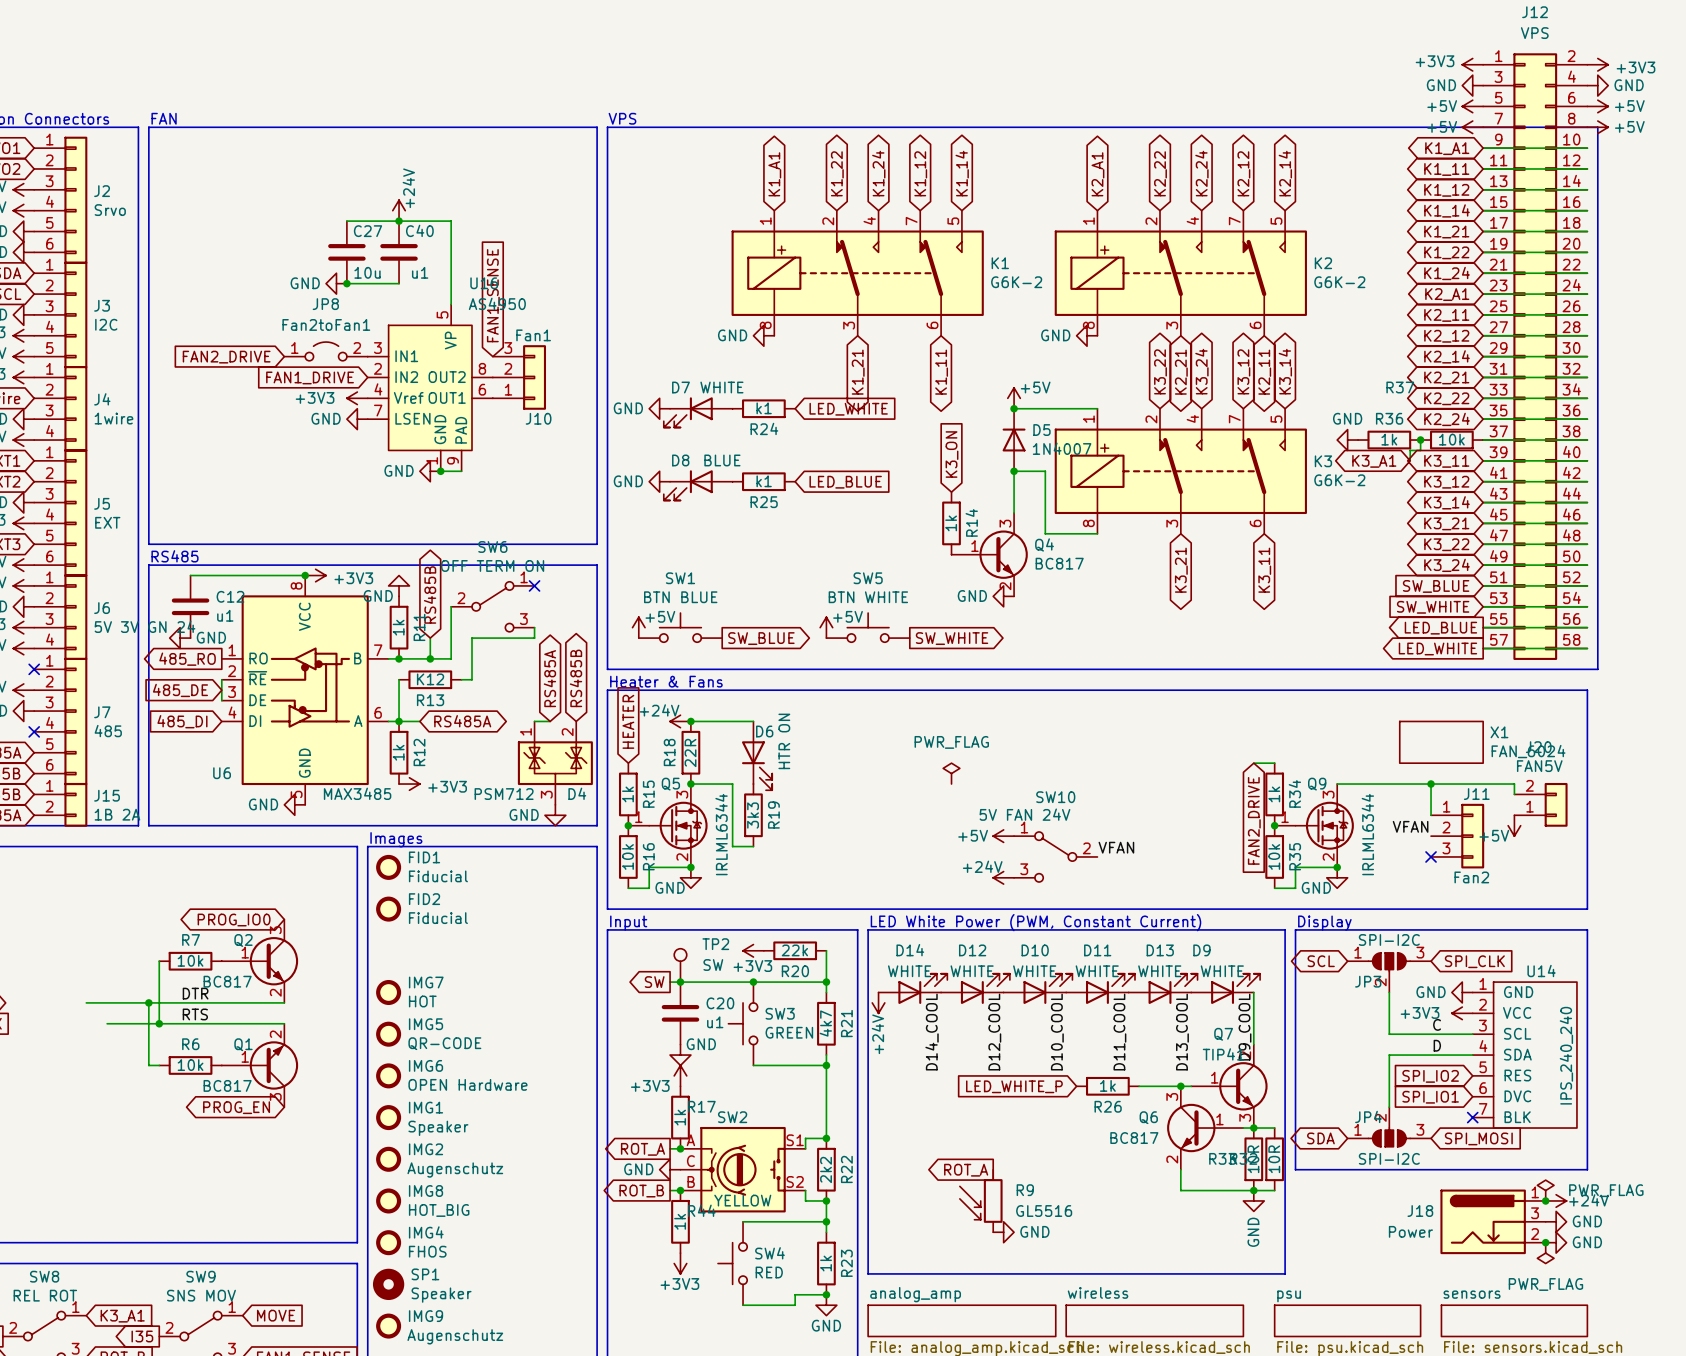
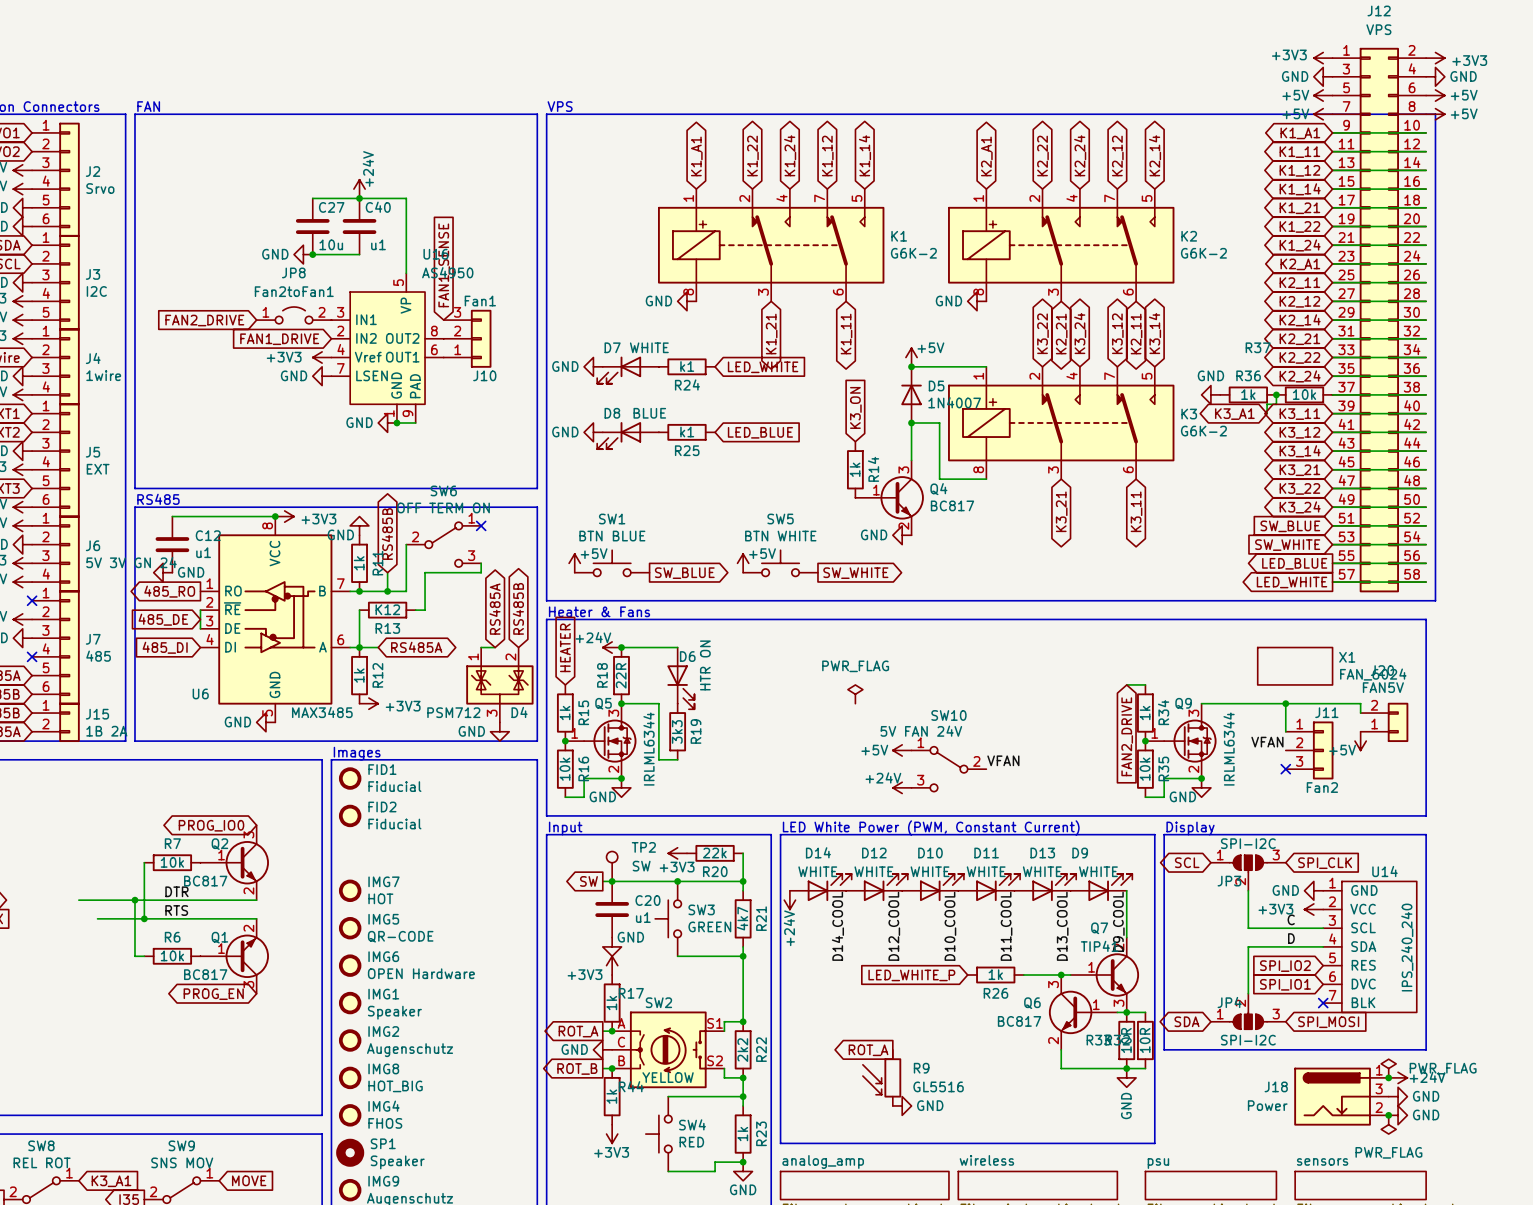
SW2 symbol: [680, 1126, 806, 1213] -> [612, 1011, 725, 1089]

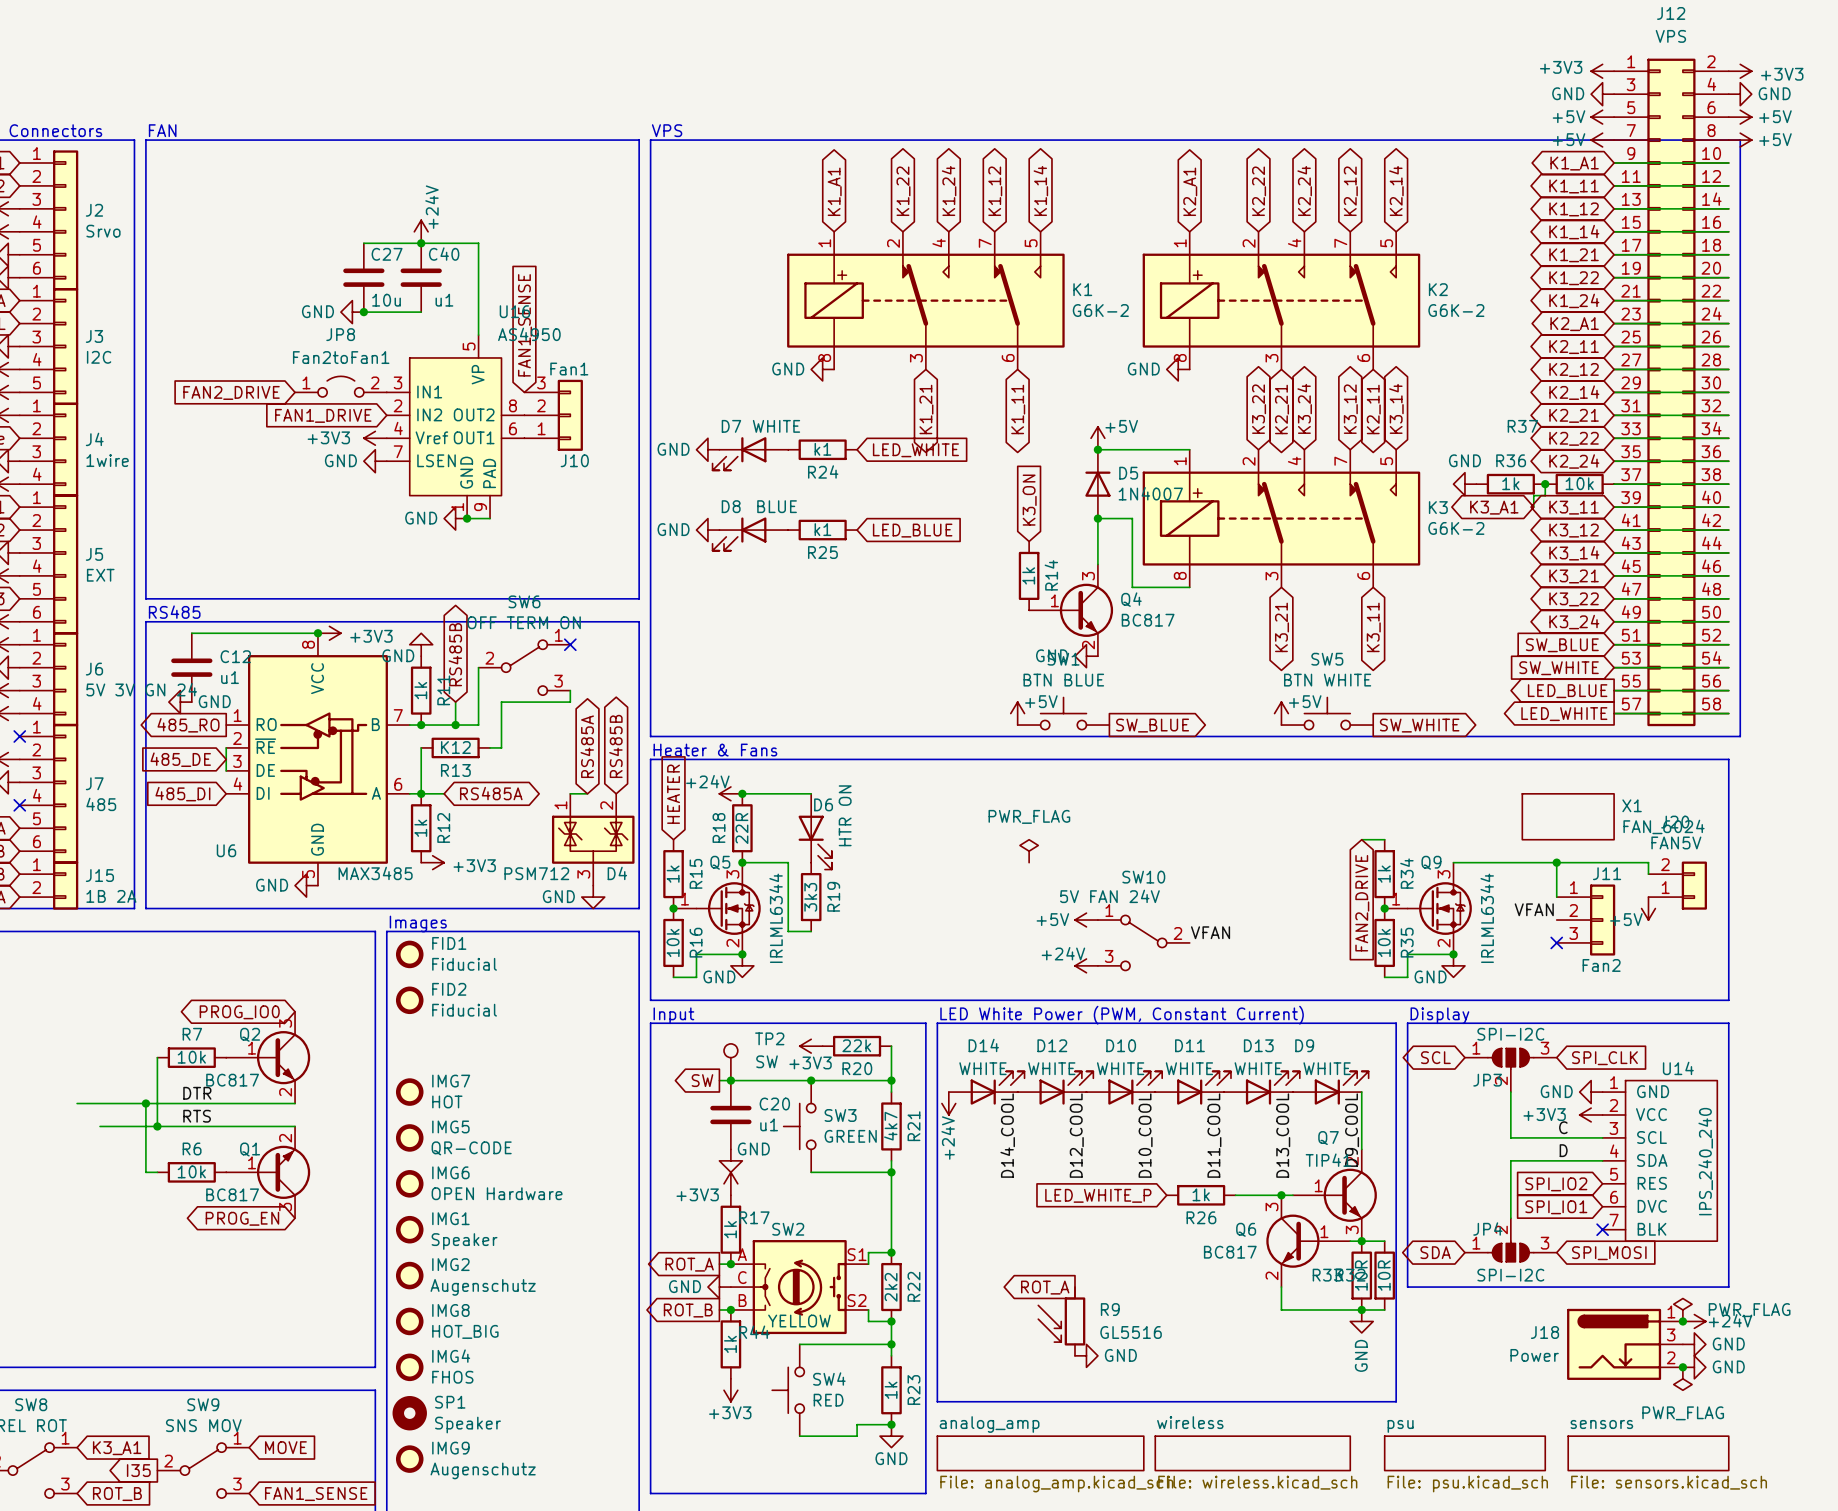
power symbol: +5V (574, 563) -> none
SW1 position: (612, 563) -> (1063, 713)
power symbol position: +5V (743, 563) -> +5V (1017, 713)
SW5 position: (780, 563) -> (1327, 713)
global label: SW_BLUE (684, 573) -> none
global label: SW_WHITE (855, 573) -> none
power symbol: none -> +5V (1281, 713)
global label: none -> SW_BLUE (1152, 725)
global label: none -> SW_WHITE (1419, 725)

